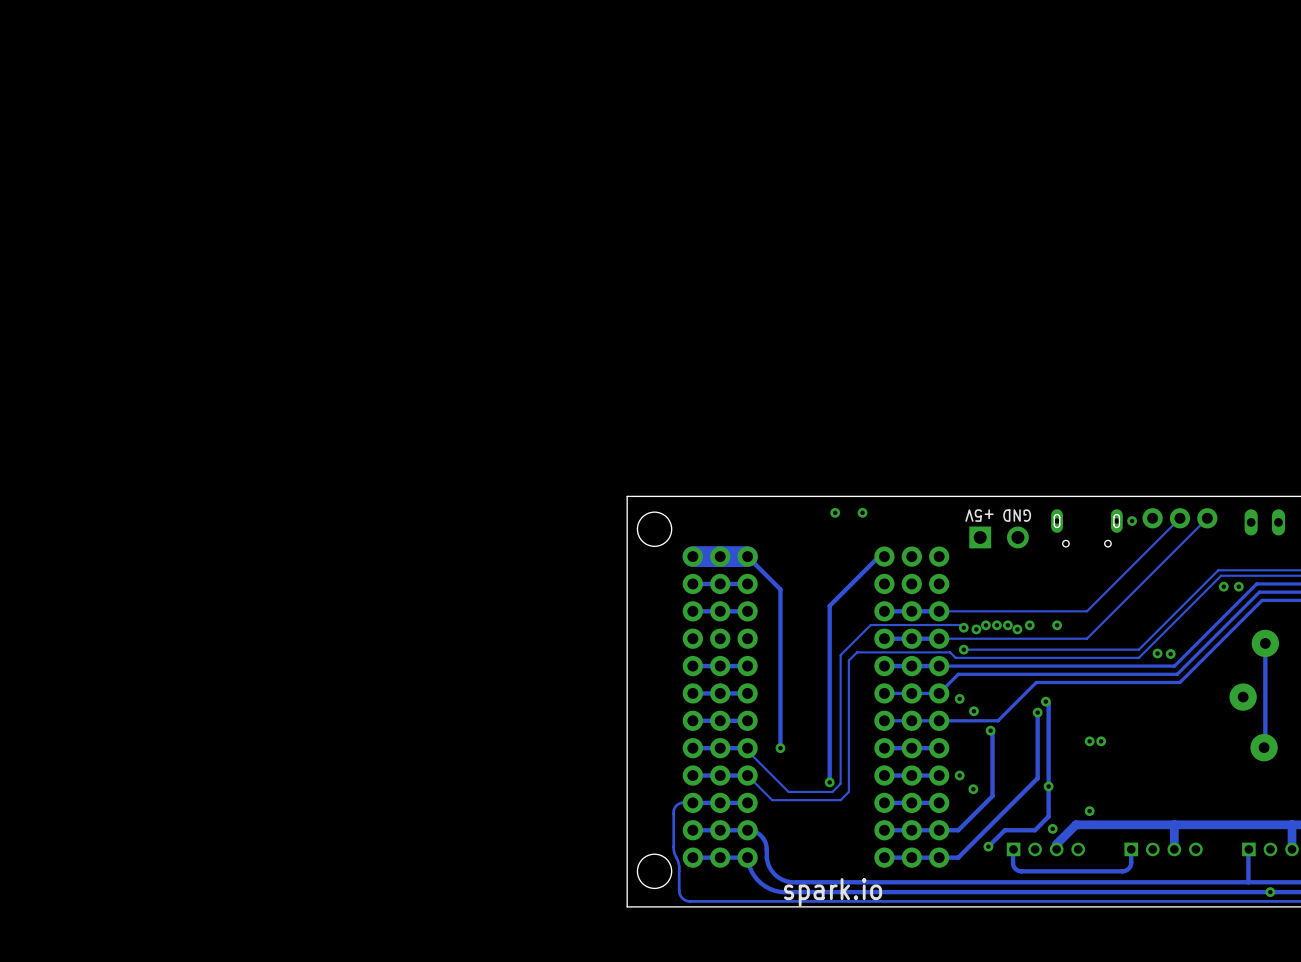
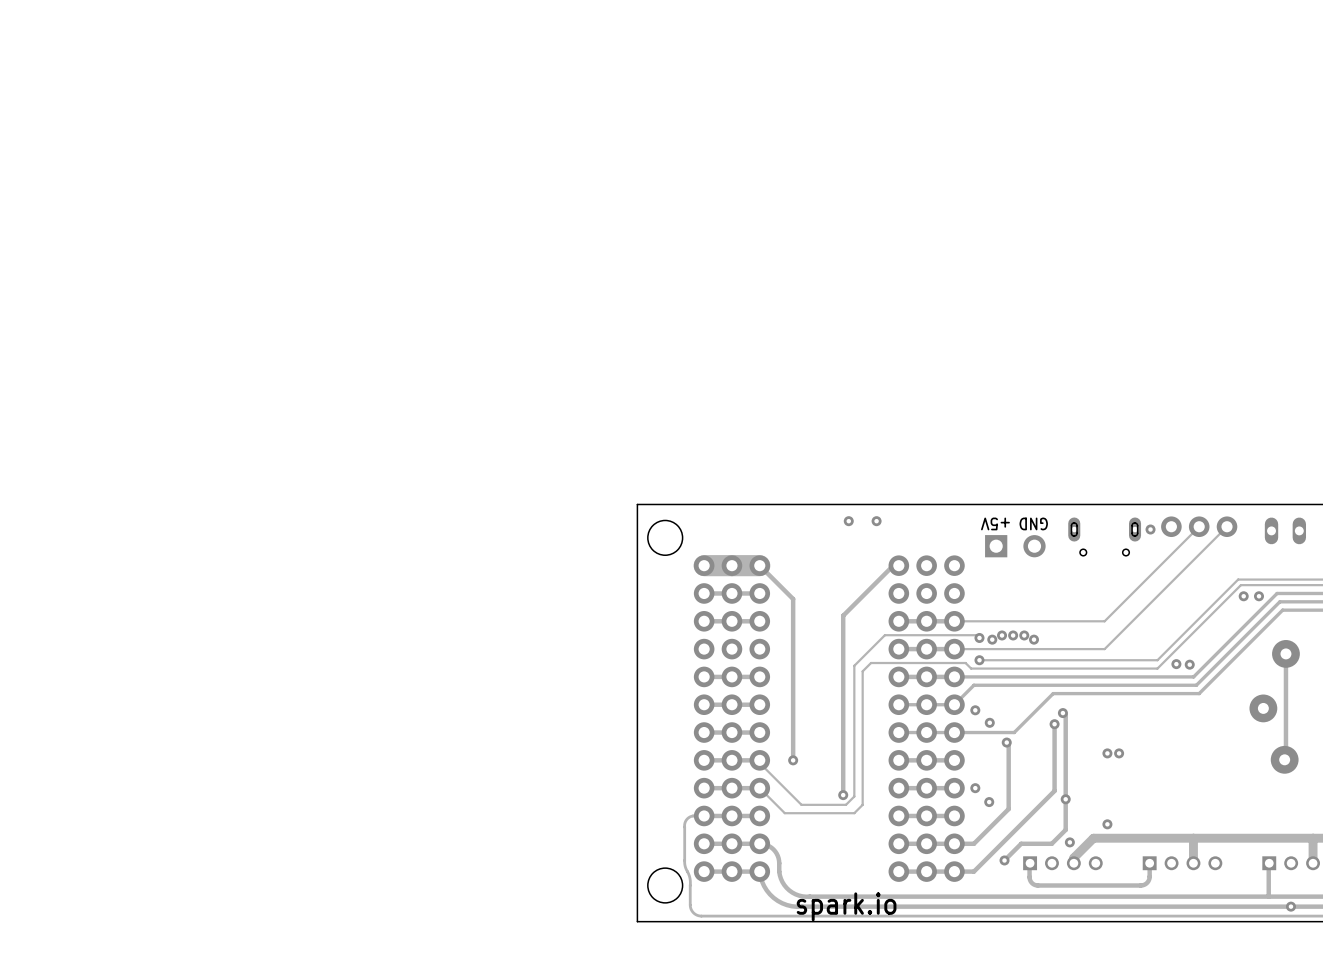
via: (1029, 625) -> none
via: (1057, 625) -> none

